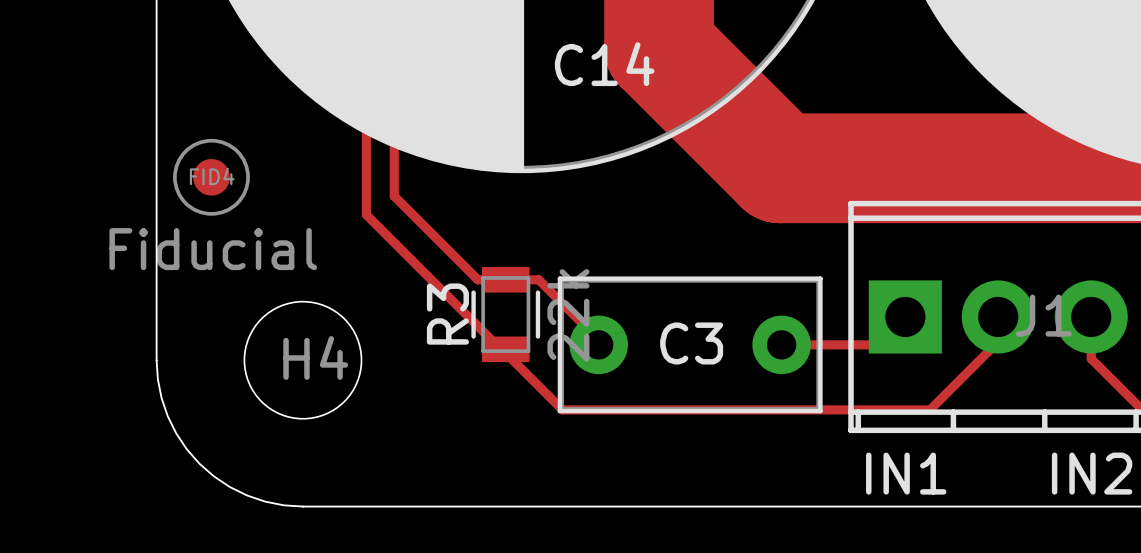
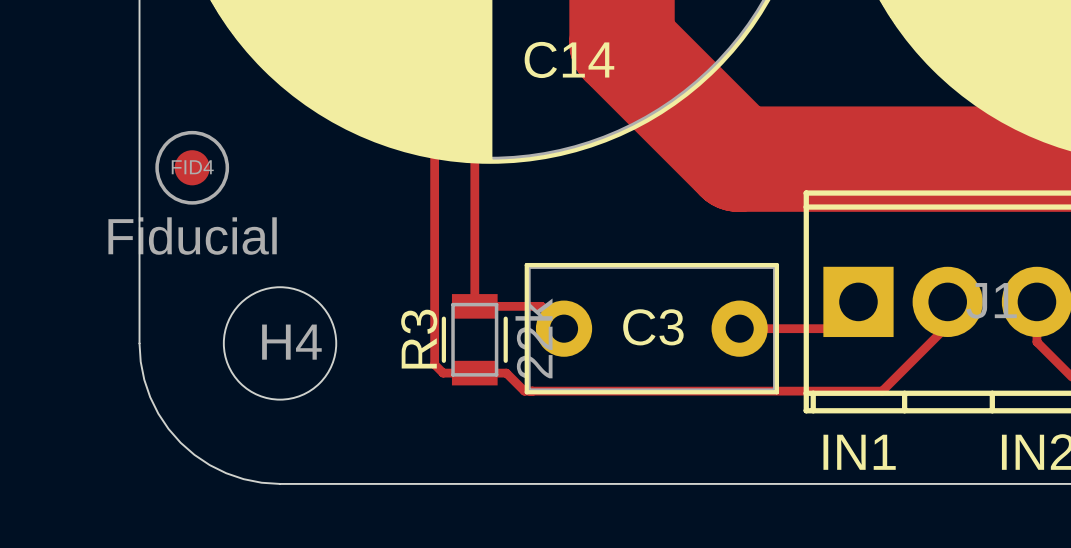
track: (394, 38) (394, 196) (477, 279) (538, 279) (598, 339) -> (367, 34) (474, 141) (474, 306) (541, 306) (564, 328)
track: (366, 47) (366, 214) (500, 349) -> (340, 43) (434, 136) (434, 364) (443, 373) (506, 373) (524, 391) (529, 391)
R3 position: (505, 314) -> (474, 339)
track: (494, 349) (505, 349) (505, 353) (562, 409) -> none

